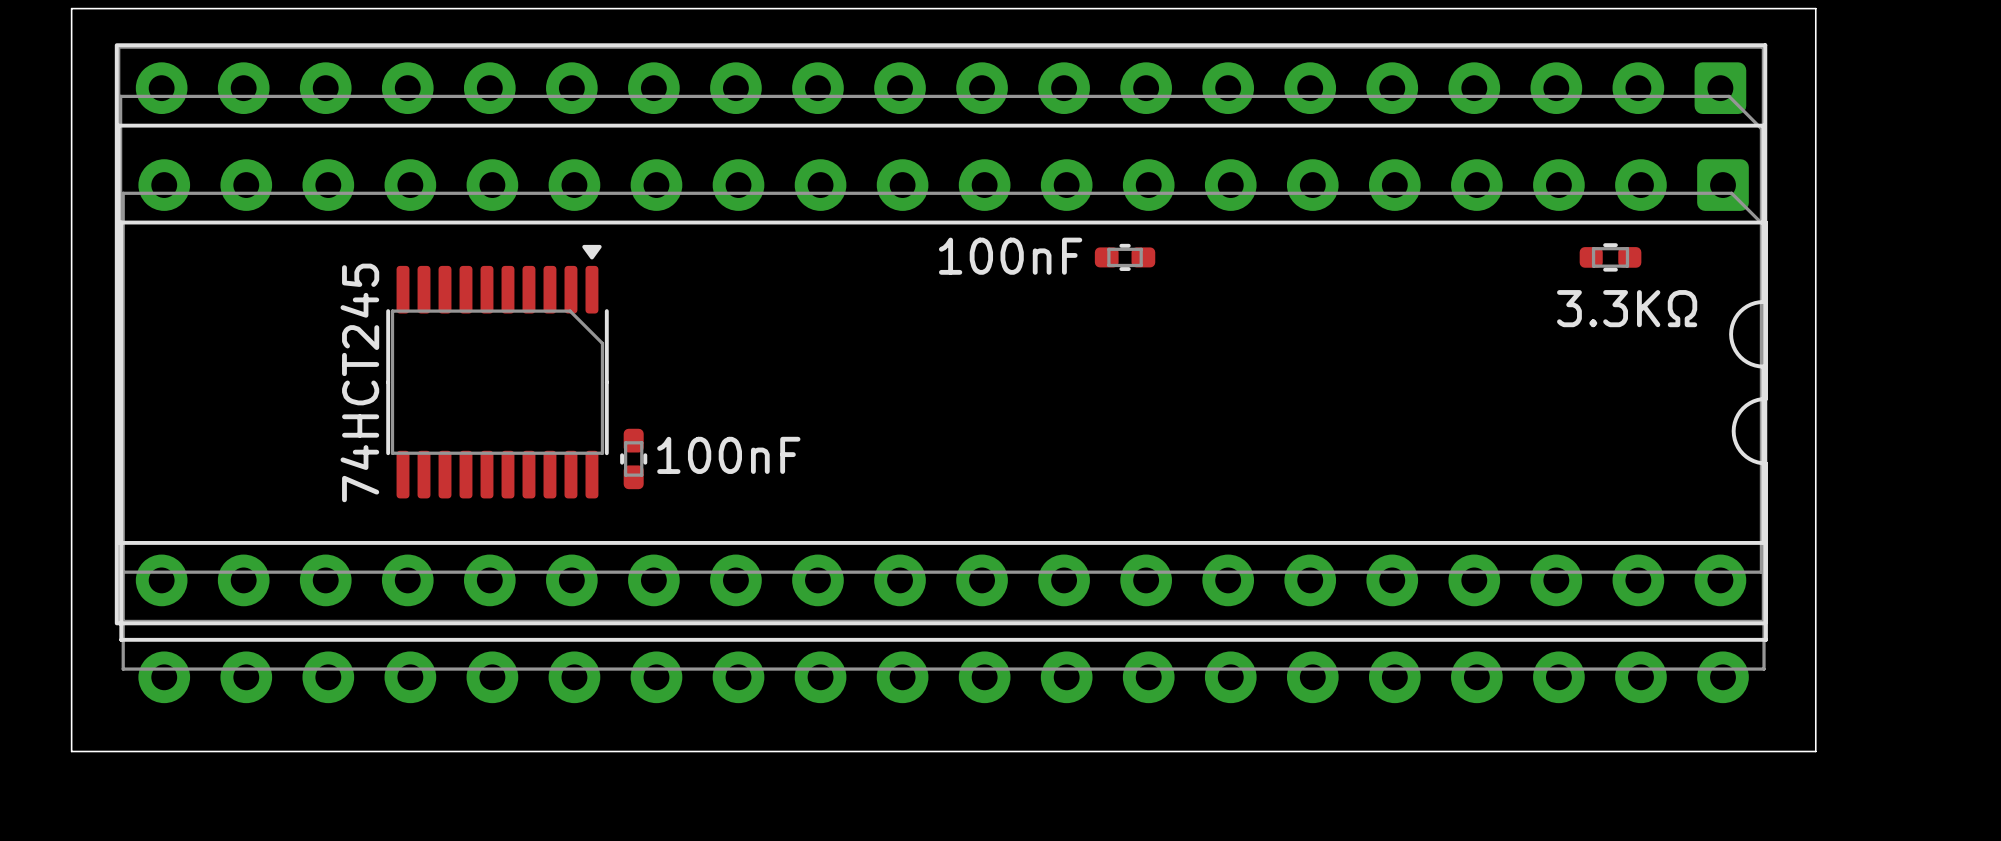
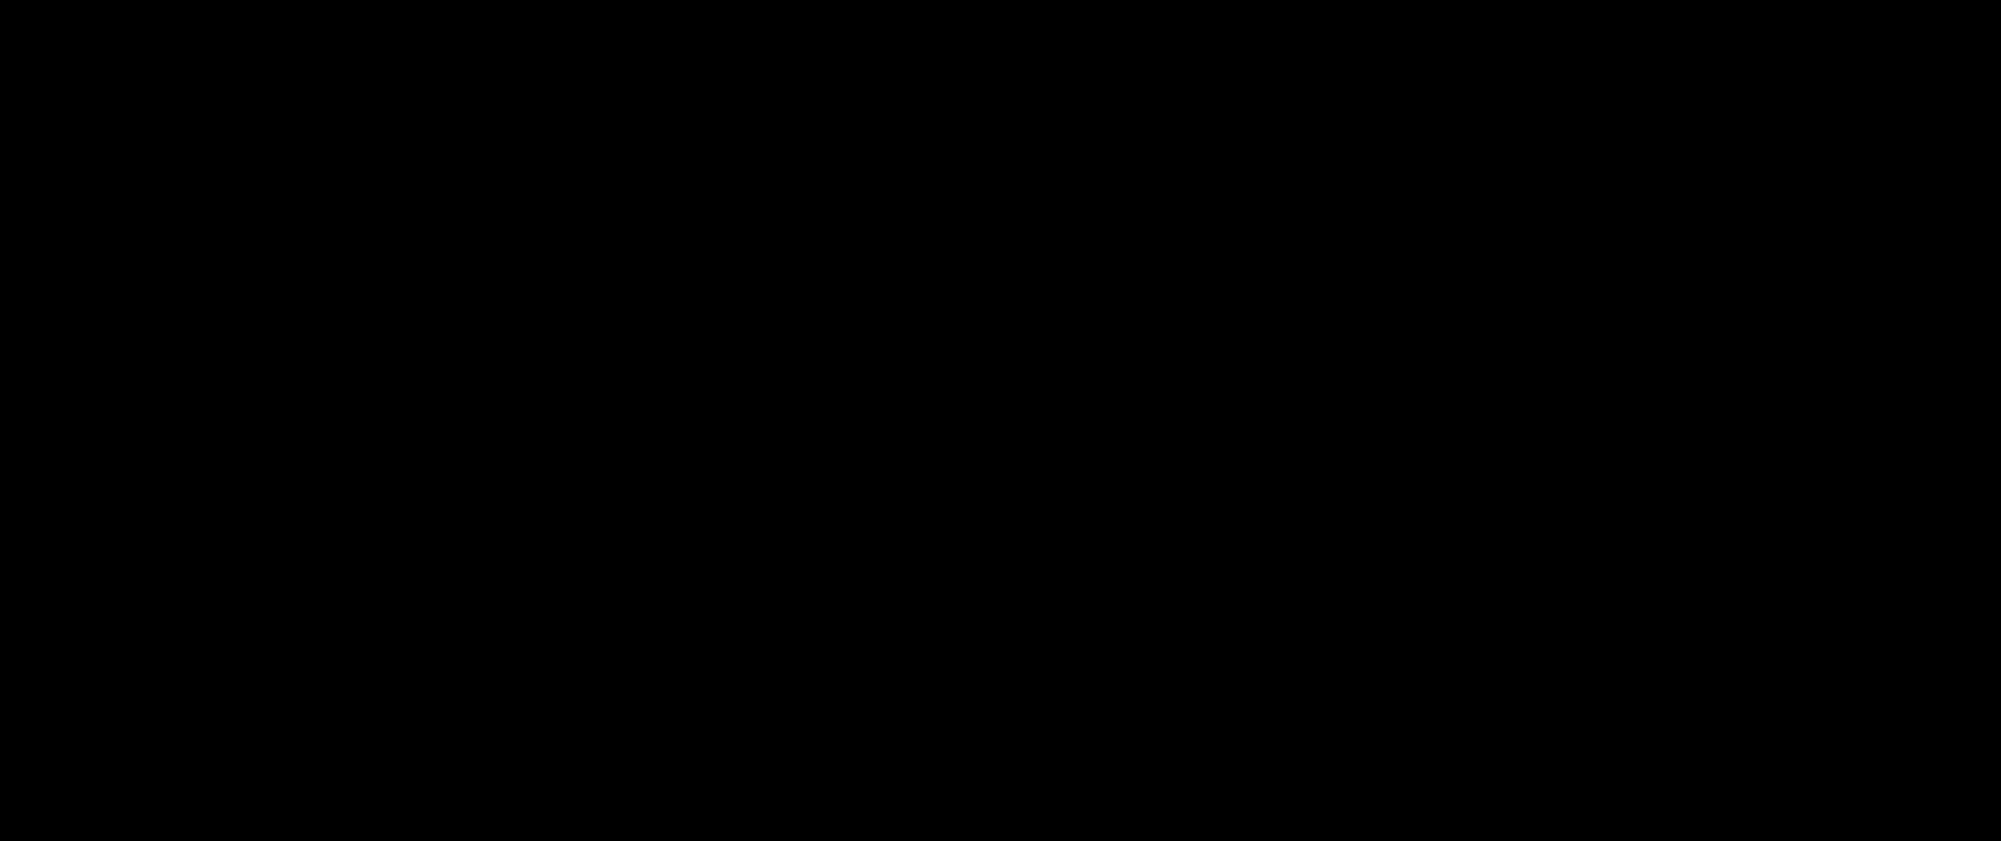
board edge: (71, 8) (1815, 8) (1815, 751) (71, 751) (71, 8) -> none
part: 100nF (1125, 257) -> none
part: 3.3KΩ (1610, 257) -> none
part: (941, 334) -> none
part: 74HCT245 (497, 371) -> none
part: (943, 431) -> none
part: 100nF (633, 458) -> none

